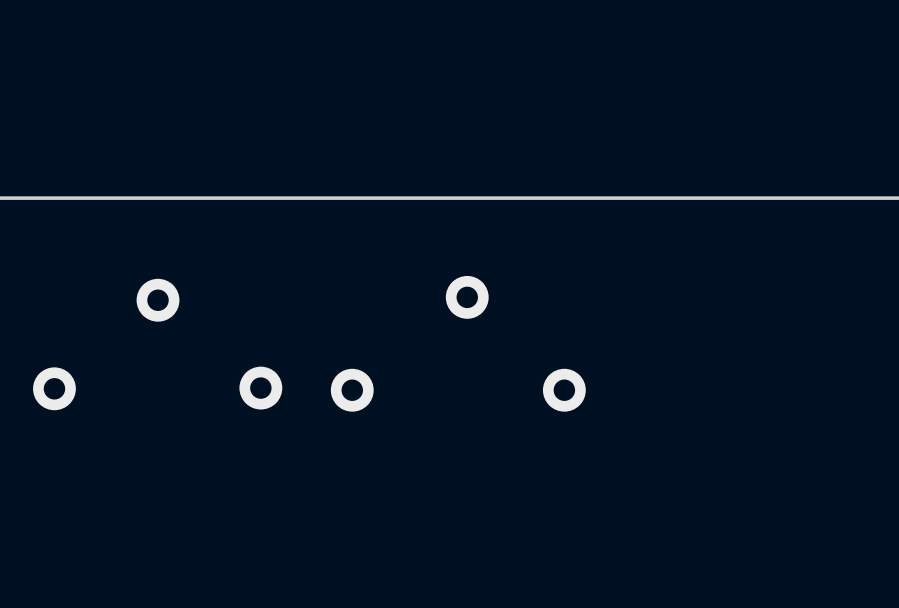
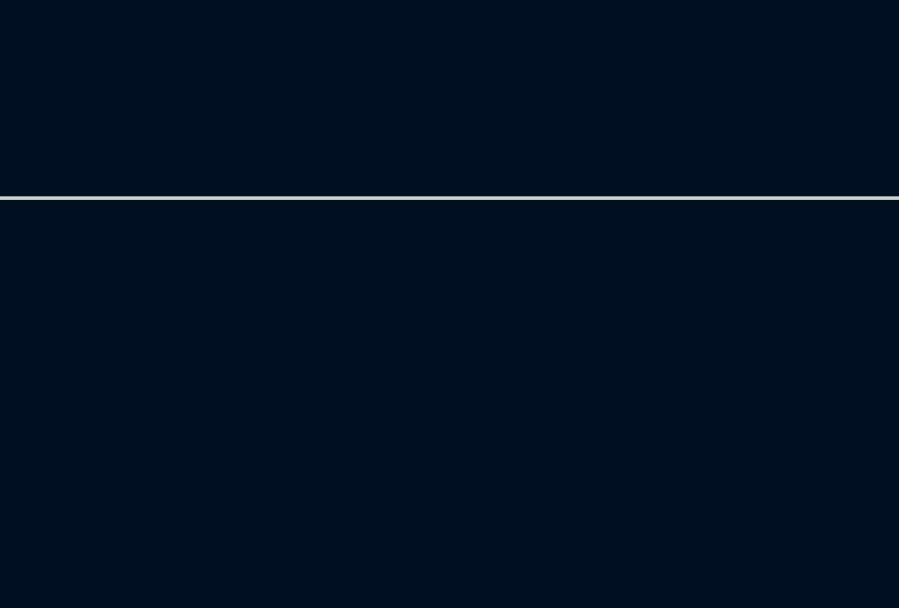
via: (467, 297) -> none
via: (158, 300) -> none
via: (54, 388) -> none
via: (260, 388) -> none
via: (352, 390) -> none
via: (564, 390) -> none

